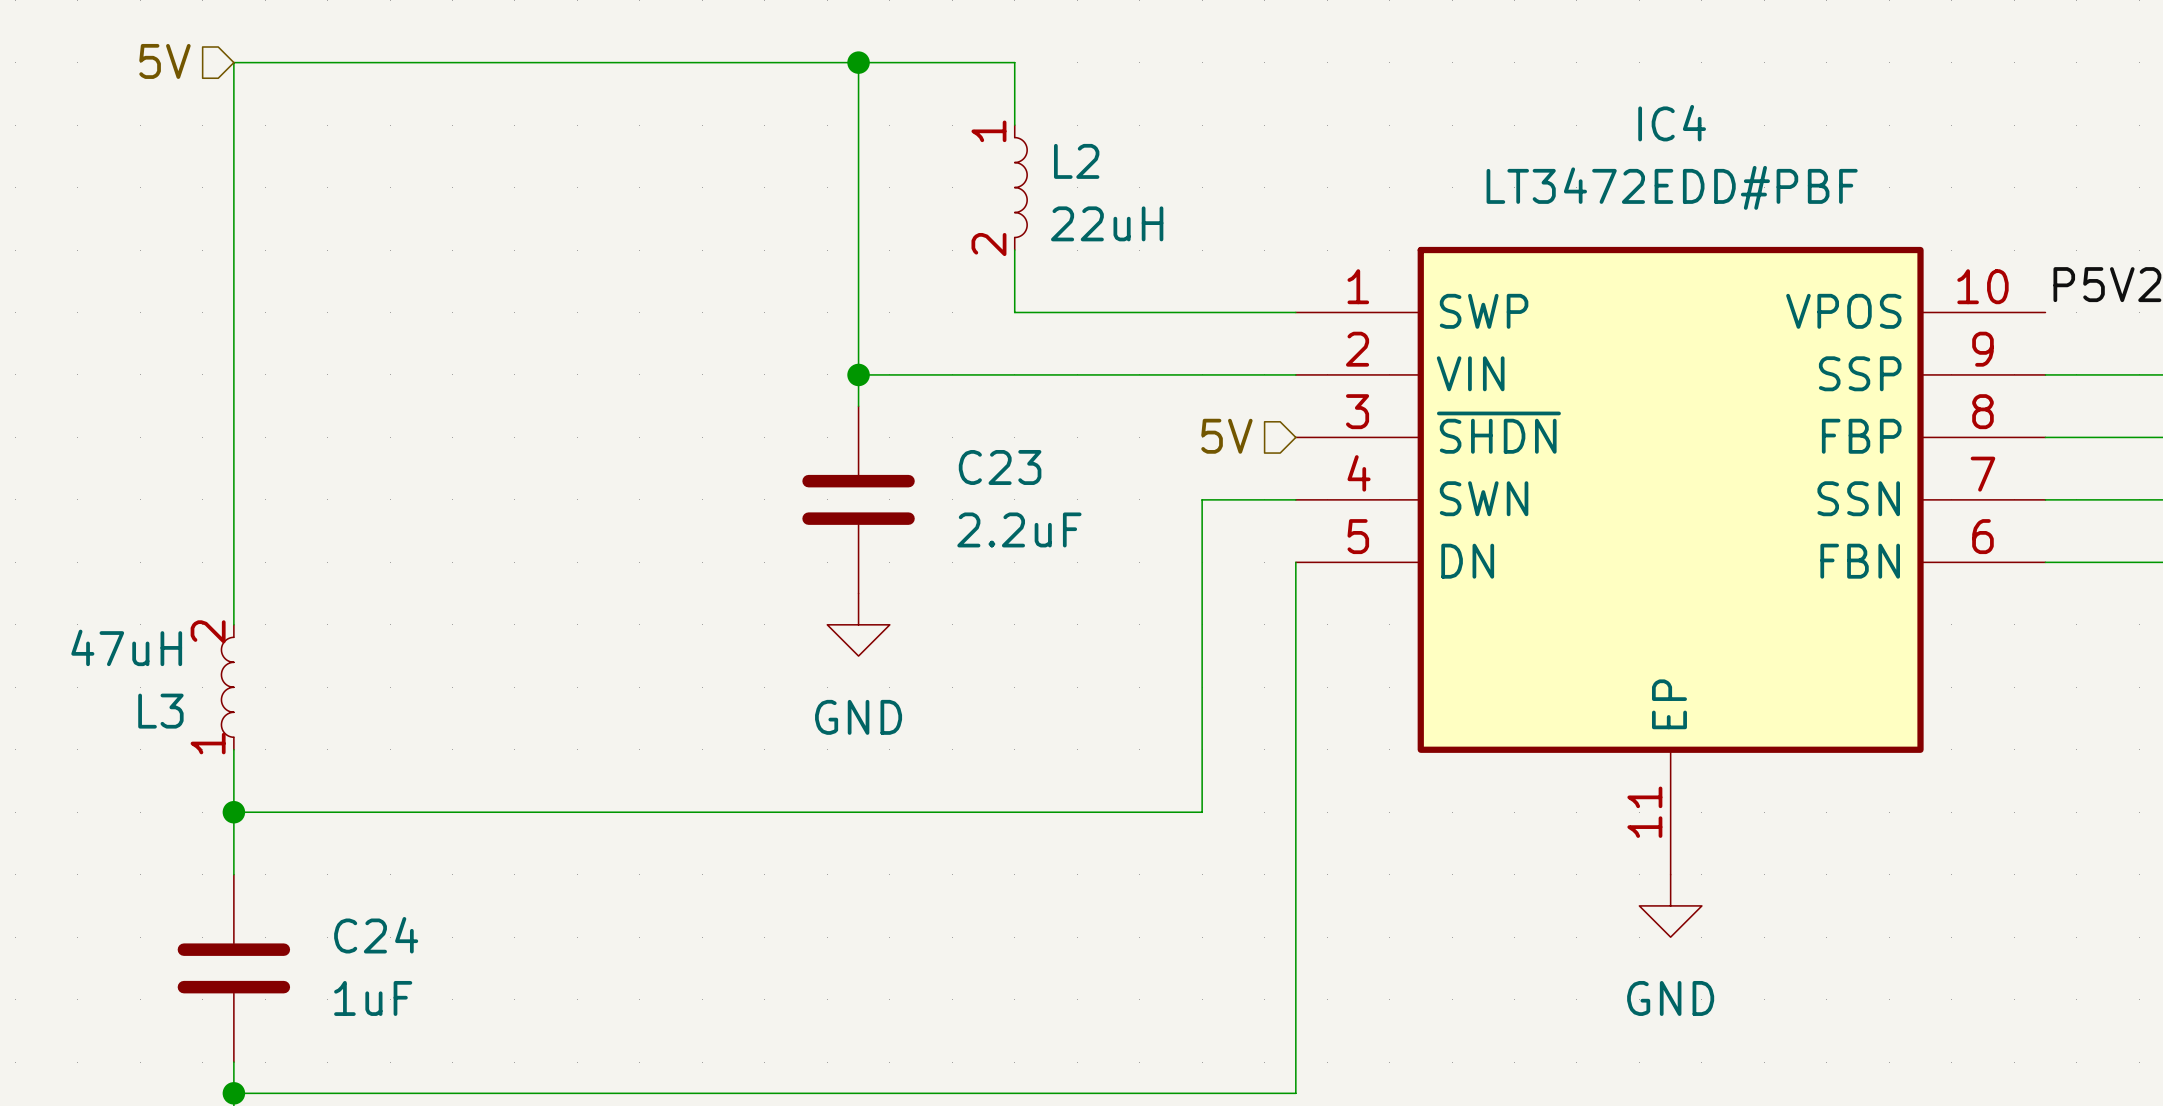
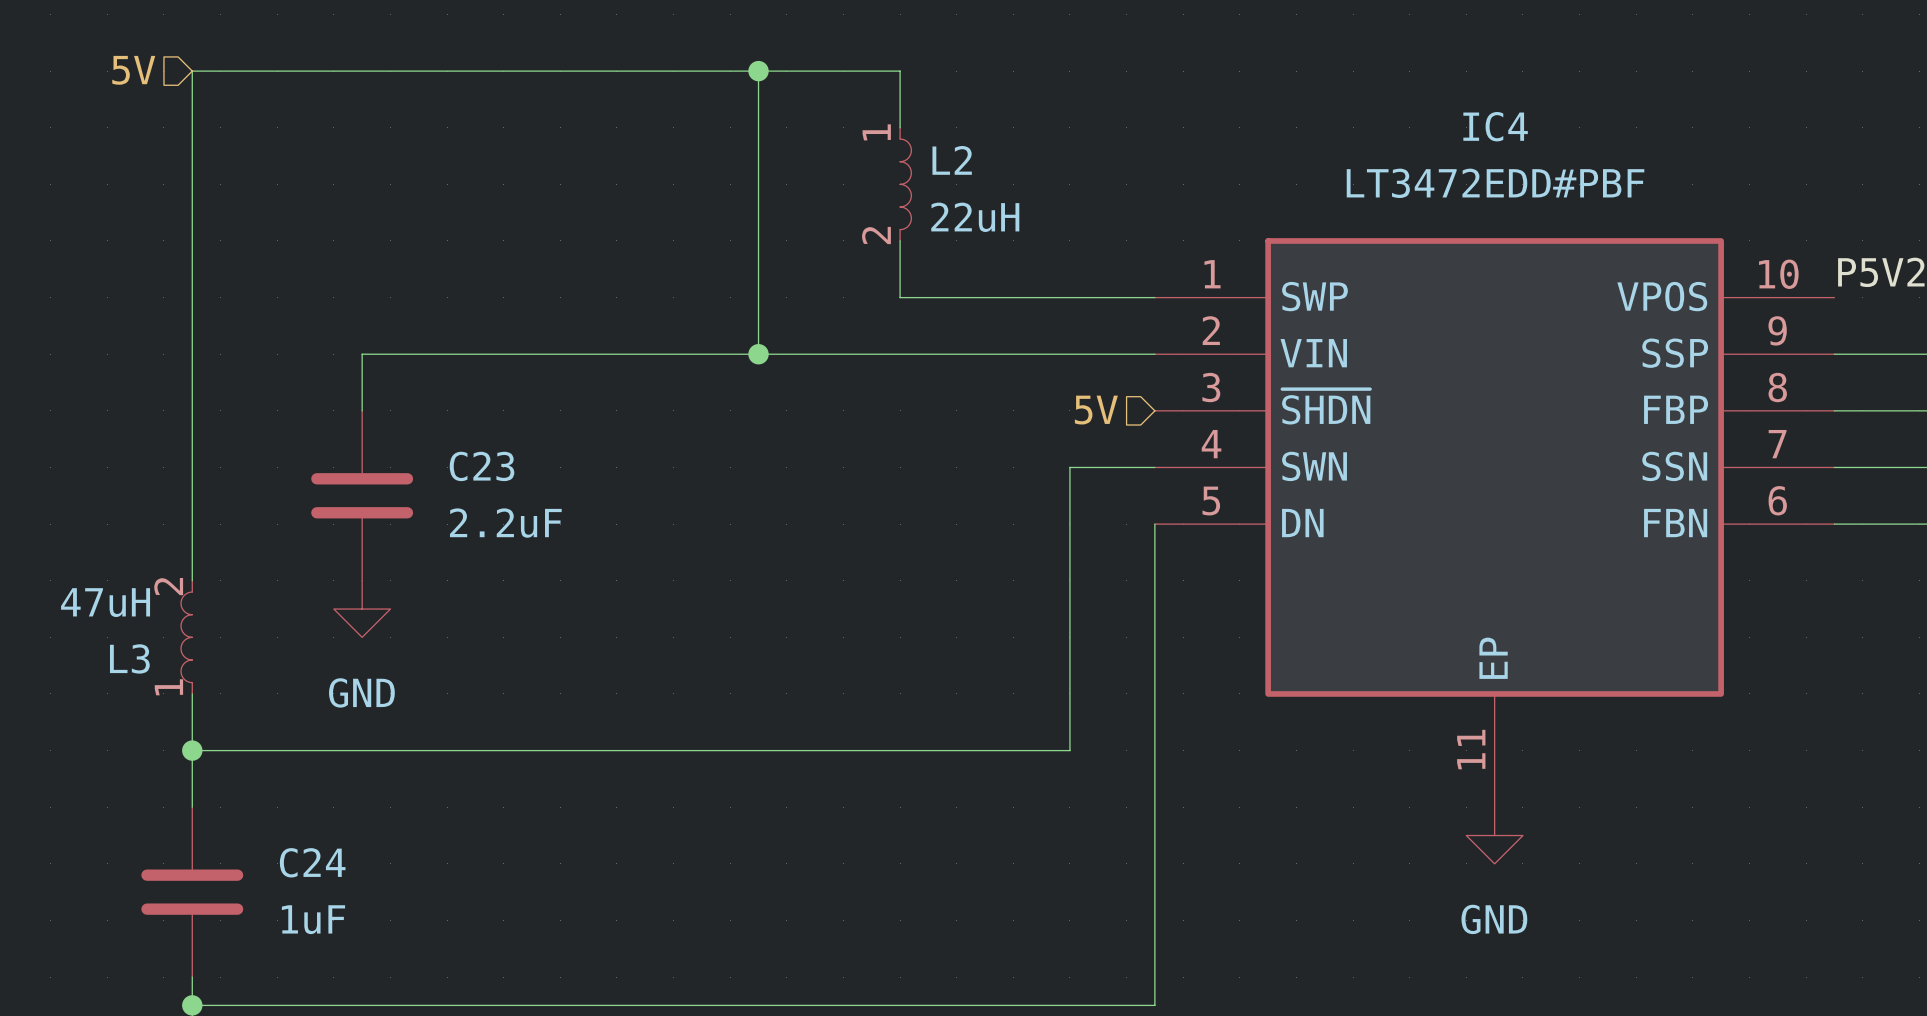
wire: (858, 374) (858, 406) -> (758, 354) (362, 354) (362, 410)
C23 position: (858, 499) -> (362, 495)
power symbol position: GND (858, 624) -> GND (362, 609)

